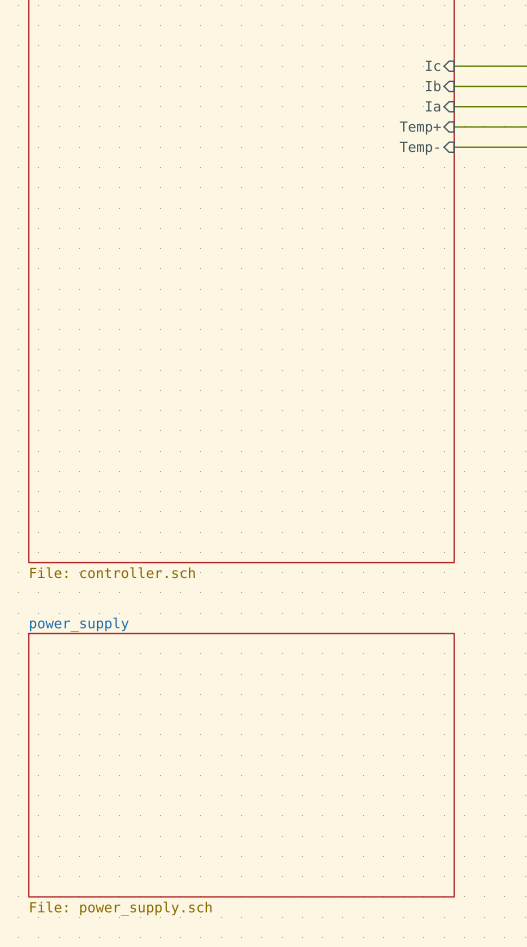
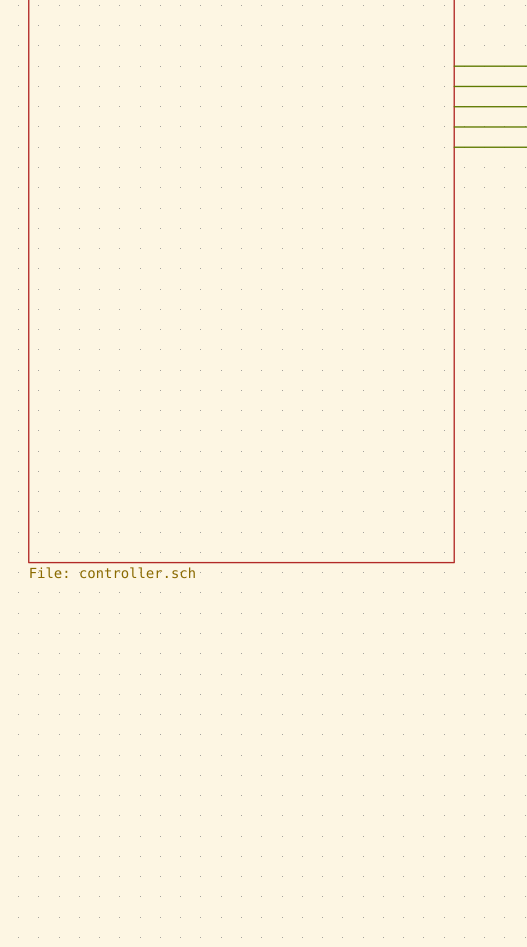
sheet pin: Ic (433, 65) -> none
sheet pin: Ib (433, 85) -> none
sheet pin: Ia (433, 106) -> none
sheet pin: Temp+ (420, 128) -> none
sheet pin: Temp- (419, 148) -> none
sheet power_supply: File: power_supply.sch (241, 765) -> none

